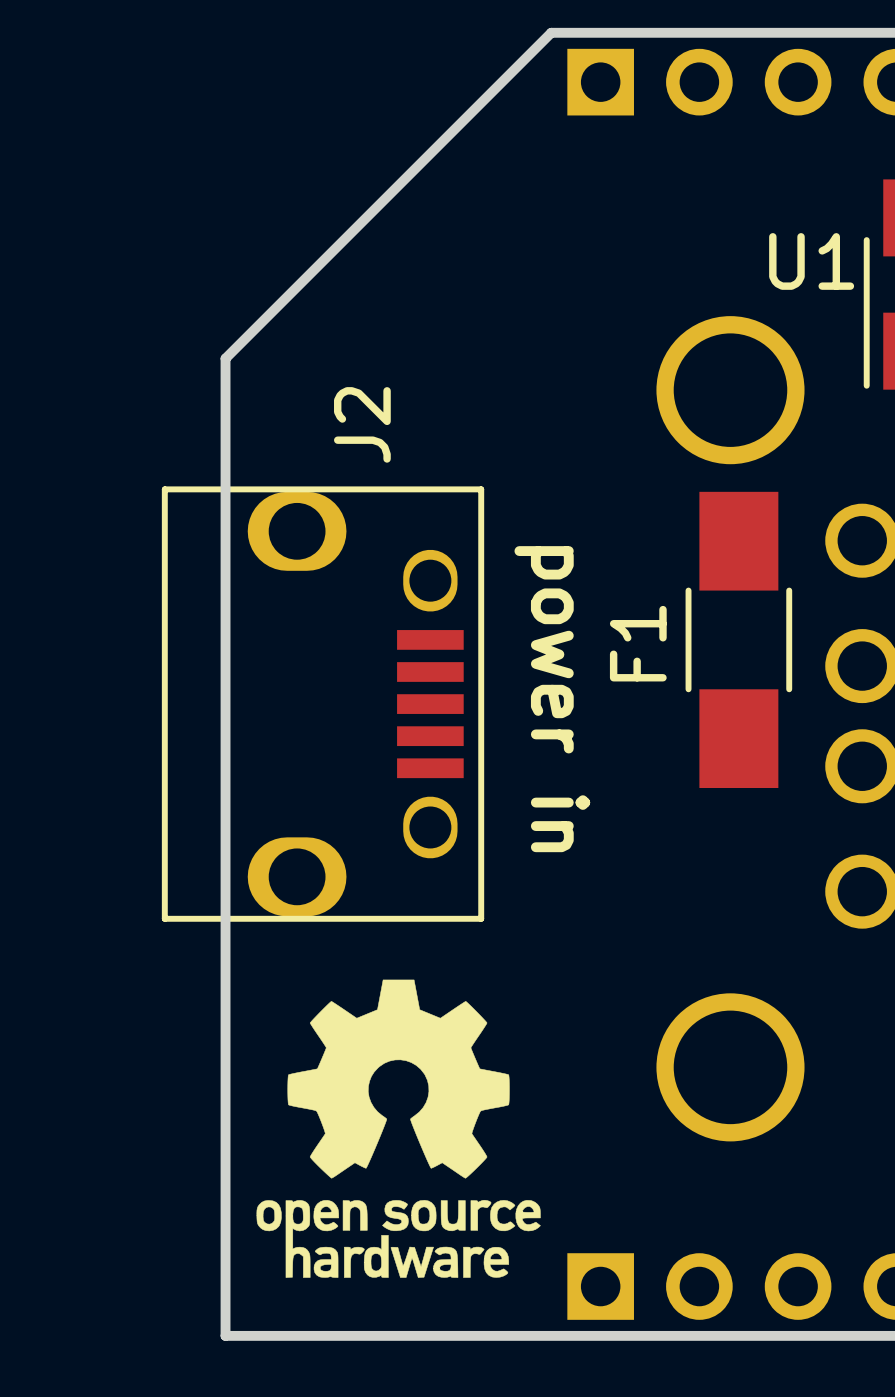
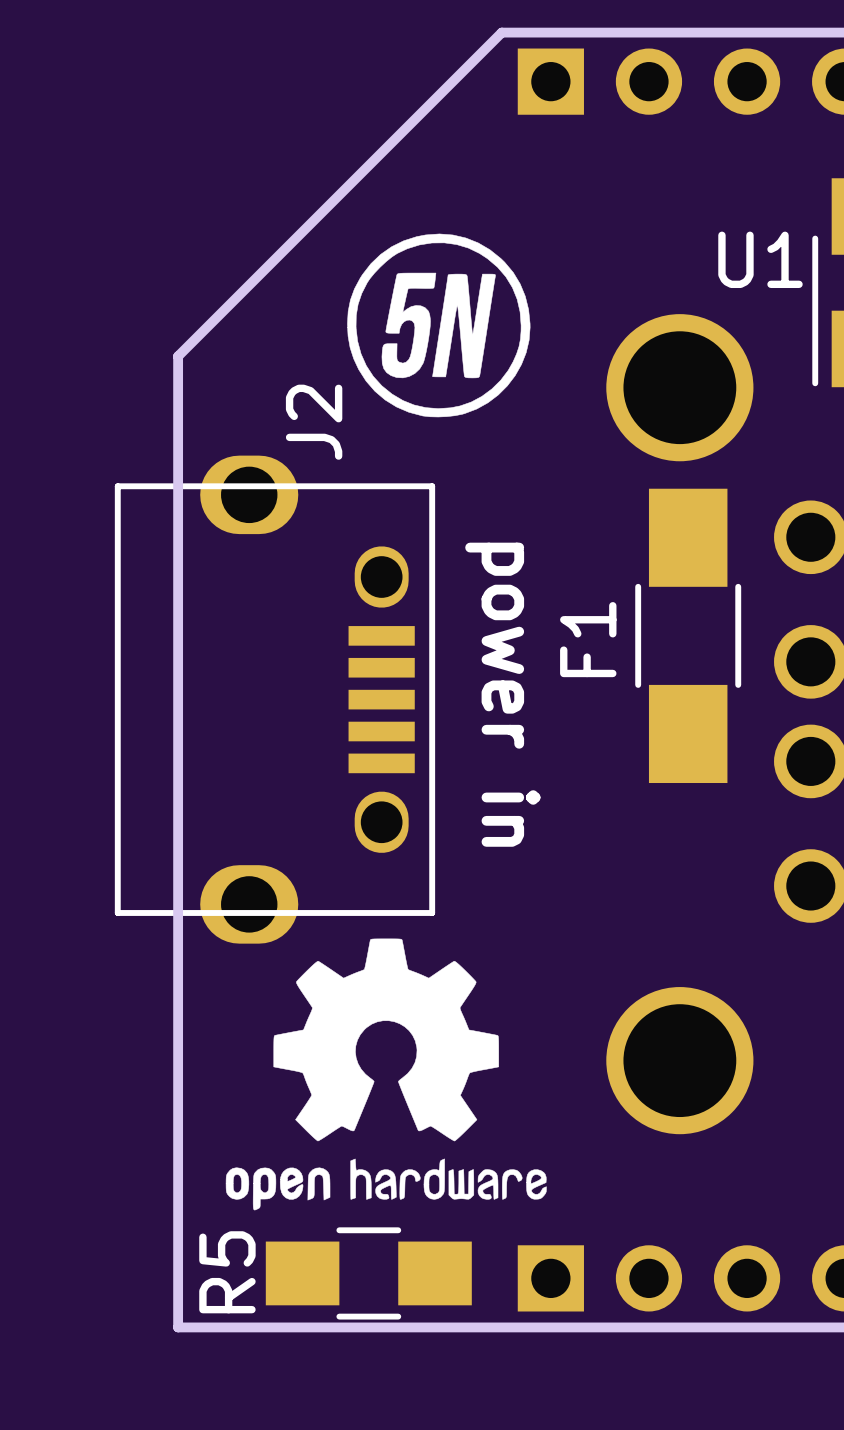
drawing: none -> [347, 233, 531, 418]
J2 footprint: [161, 486, 485, 922] -> [114, 455, 436, 944]
drawing: none -> [225, 938, 547, 1211]
drawing: [256, 979, 541, 1278] -> none
R5: none -> (368, 1273)

